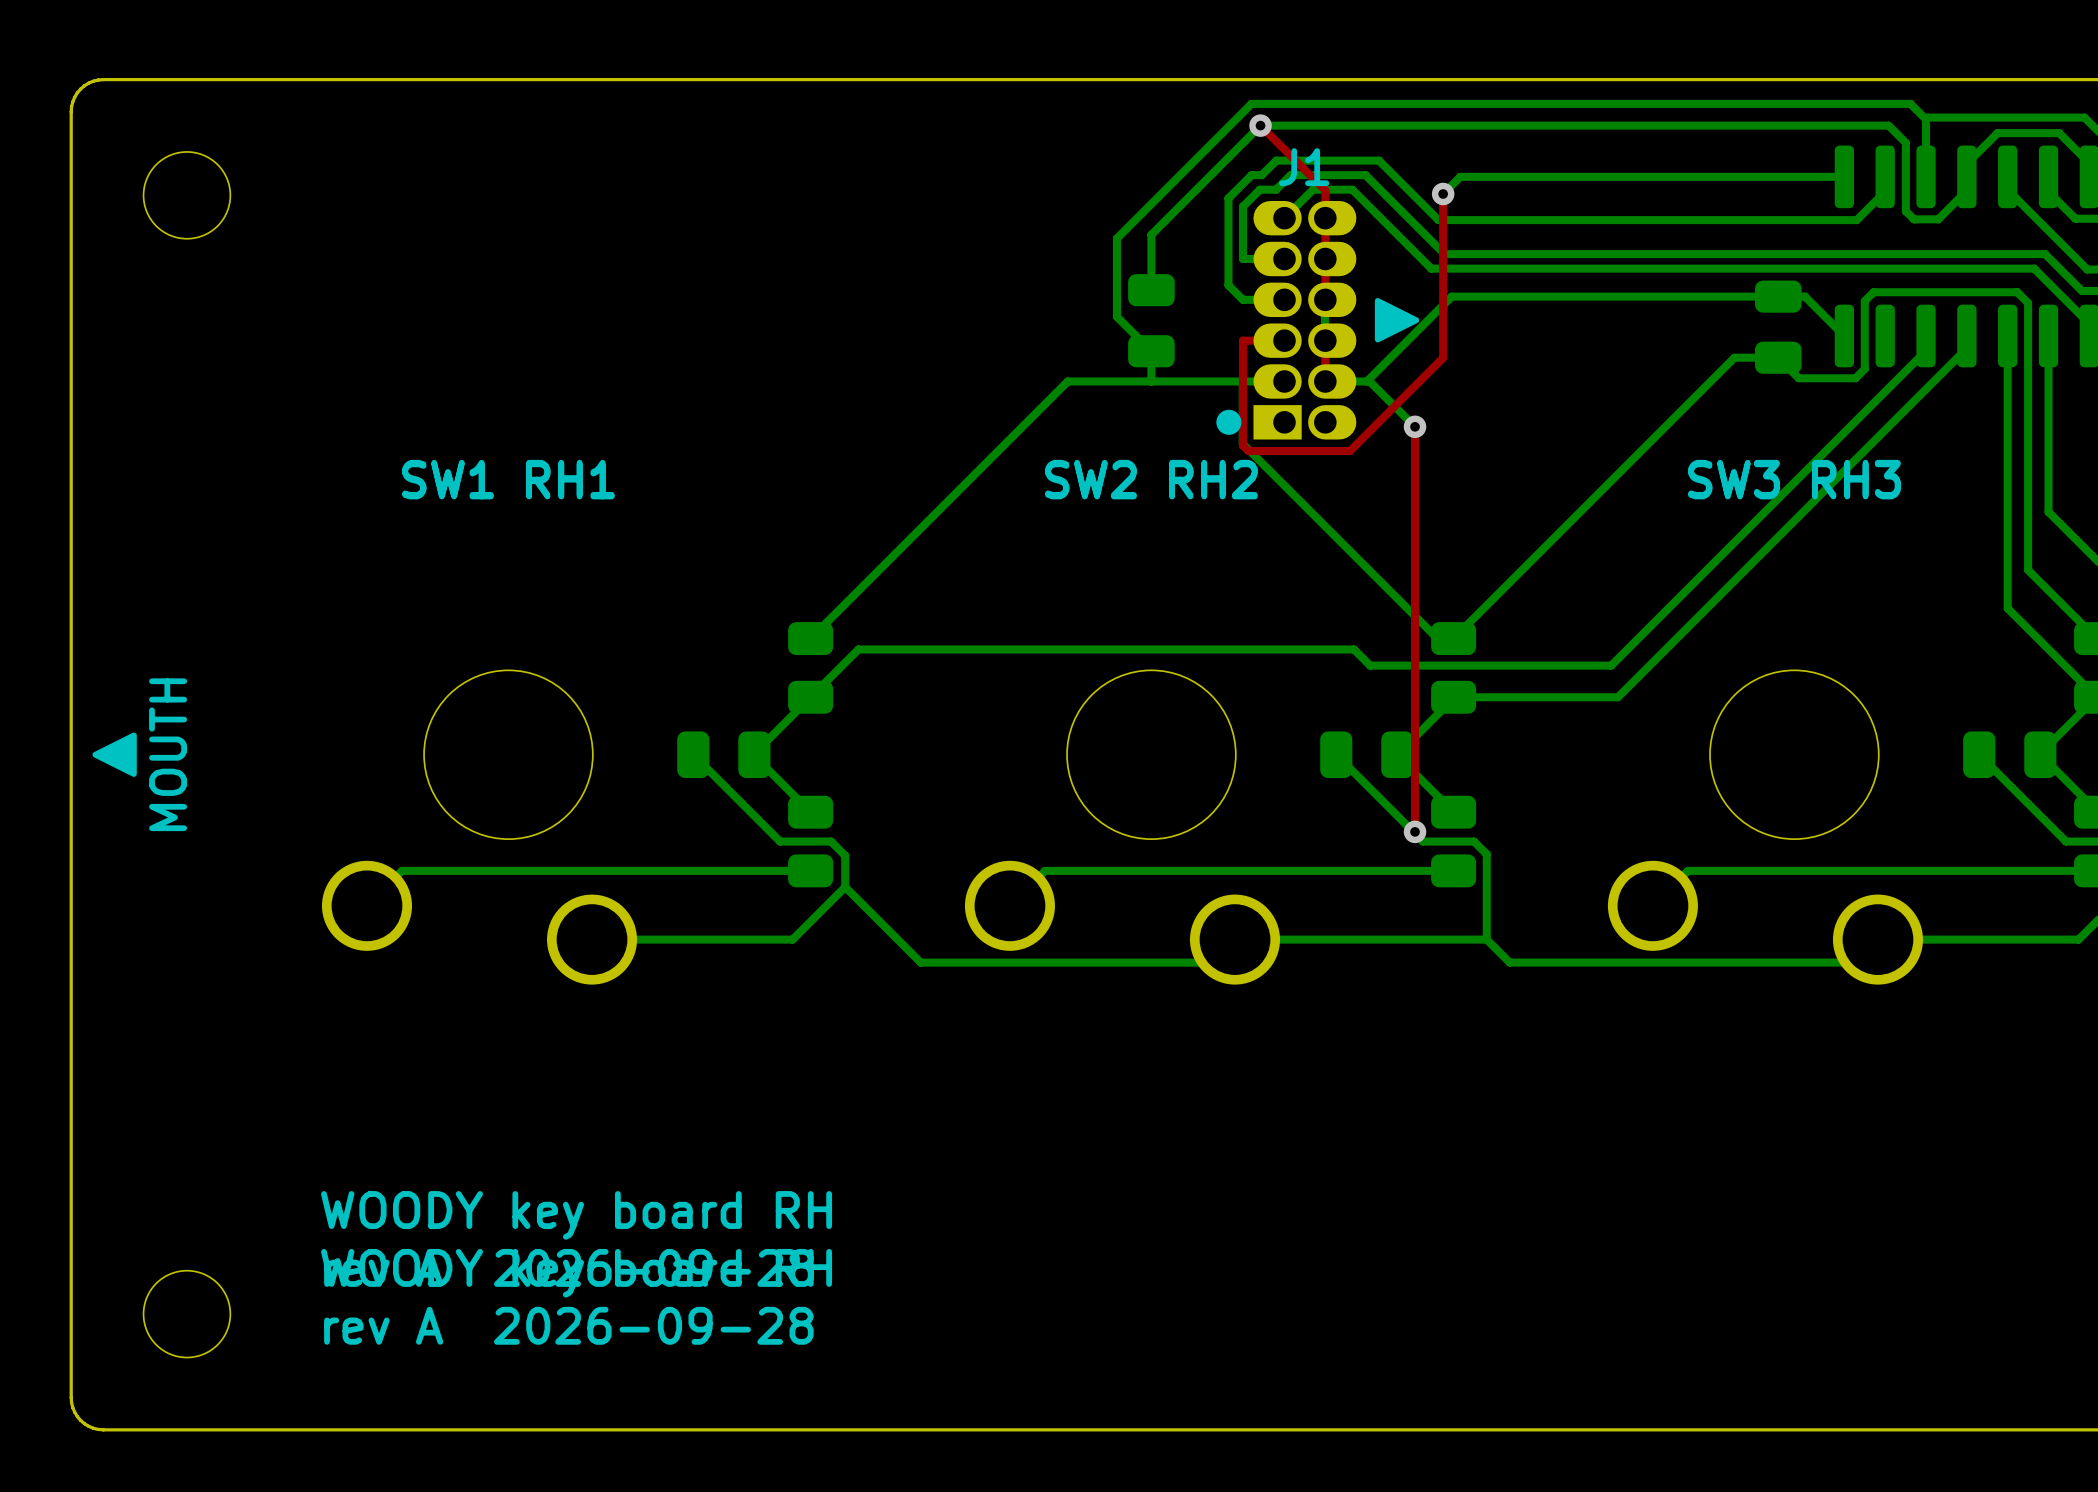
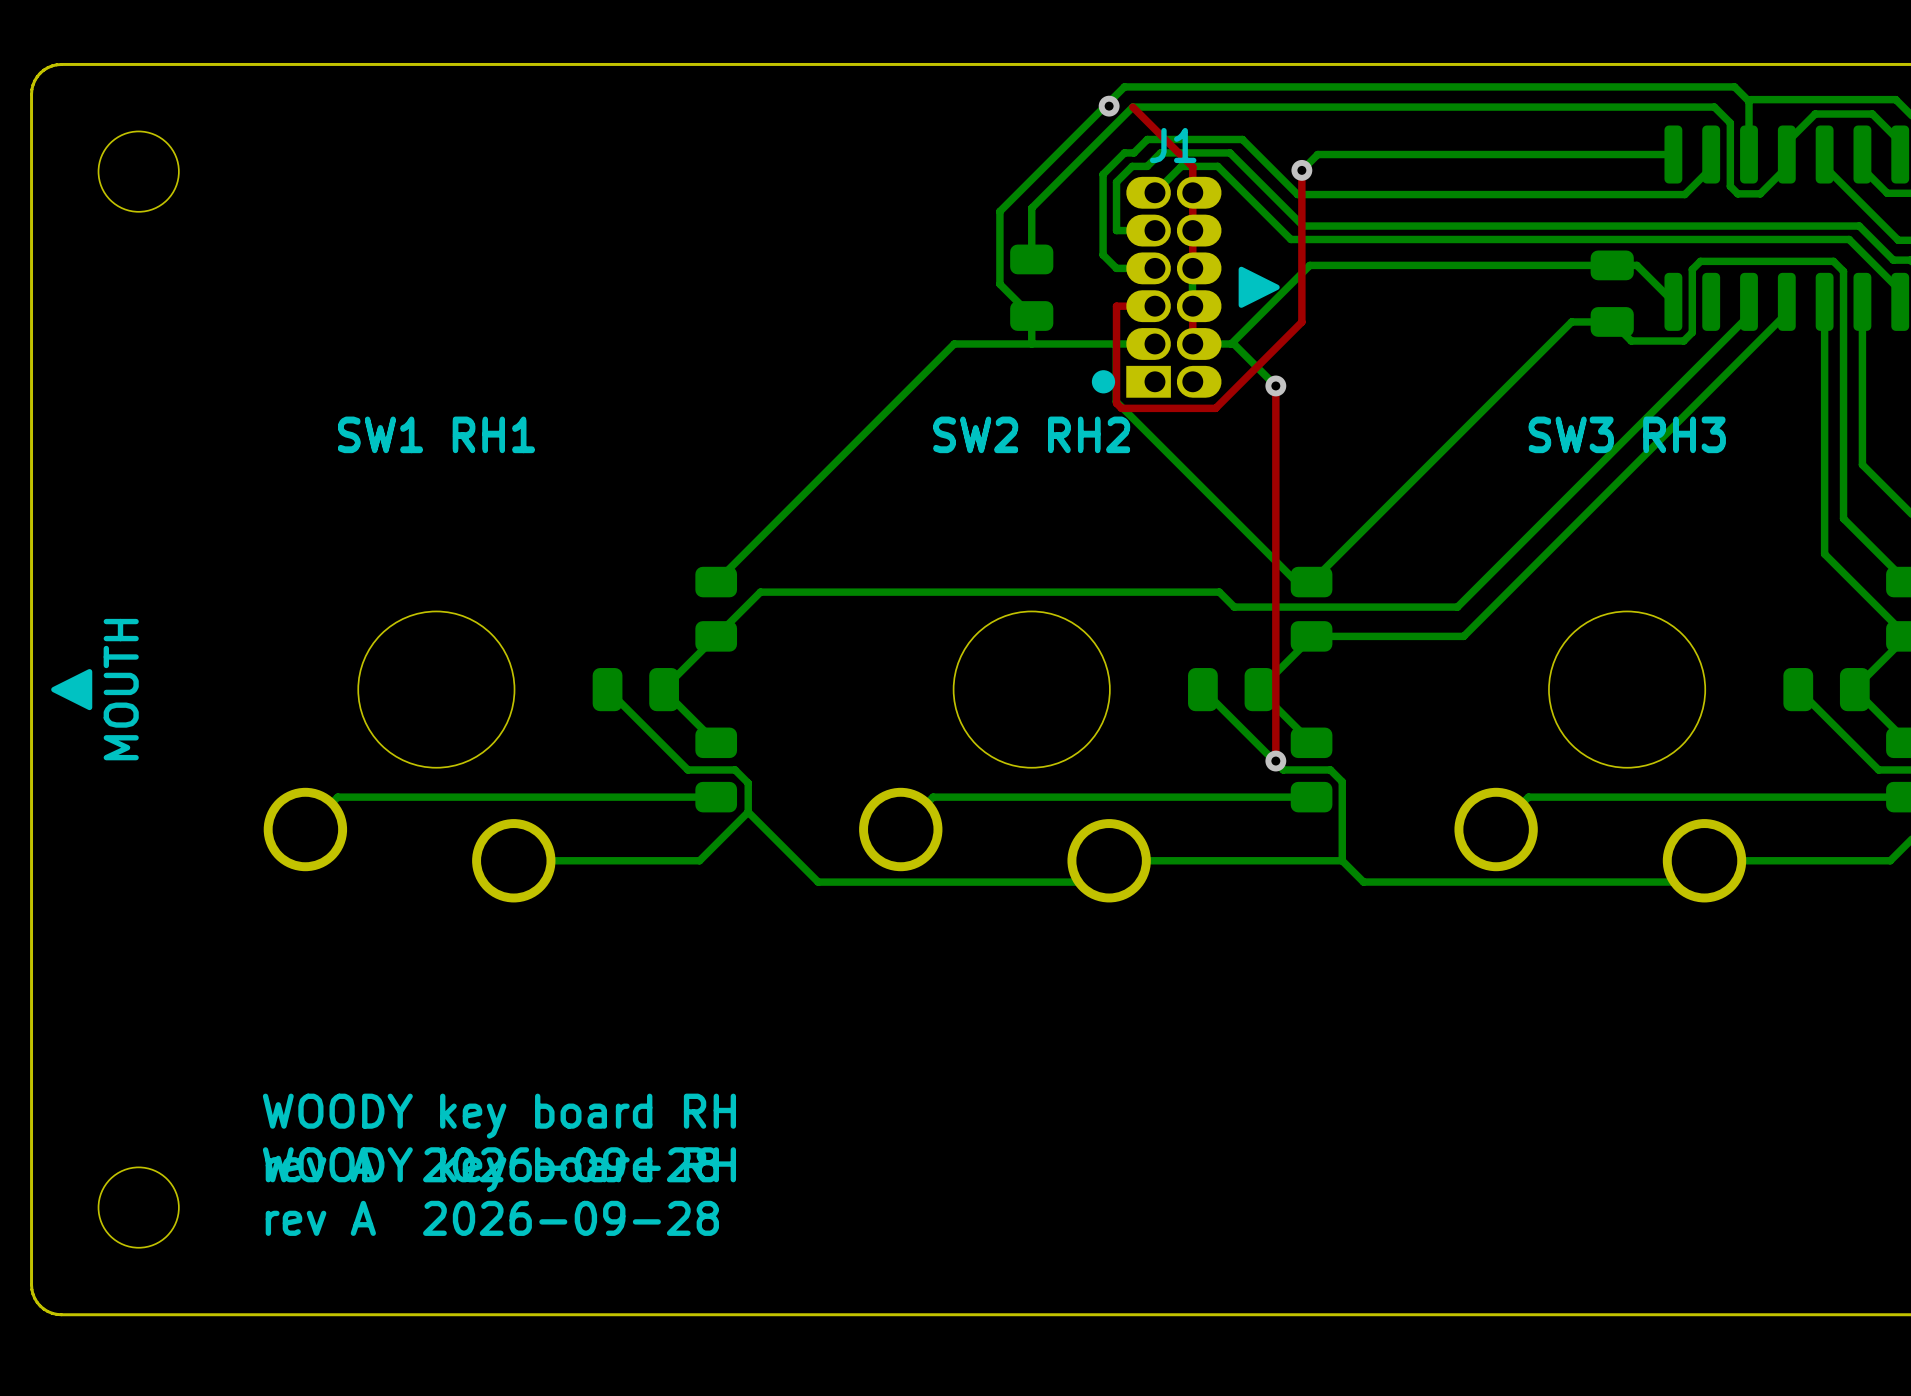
via position: (1260, 125) -> (1109, 106)

